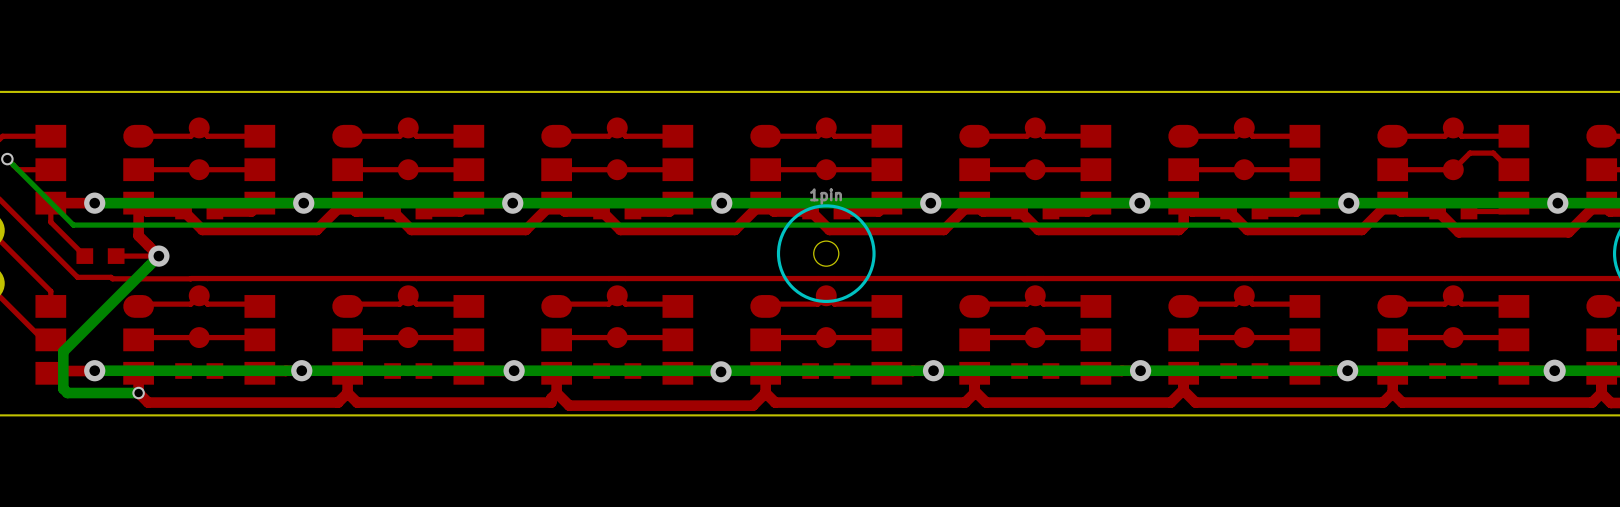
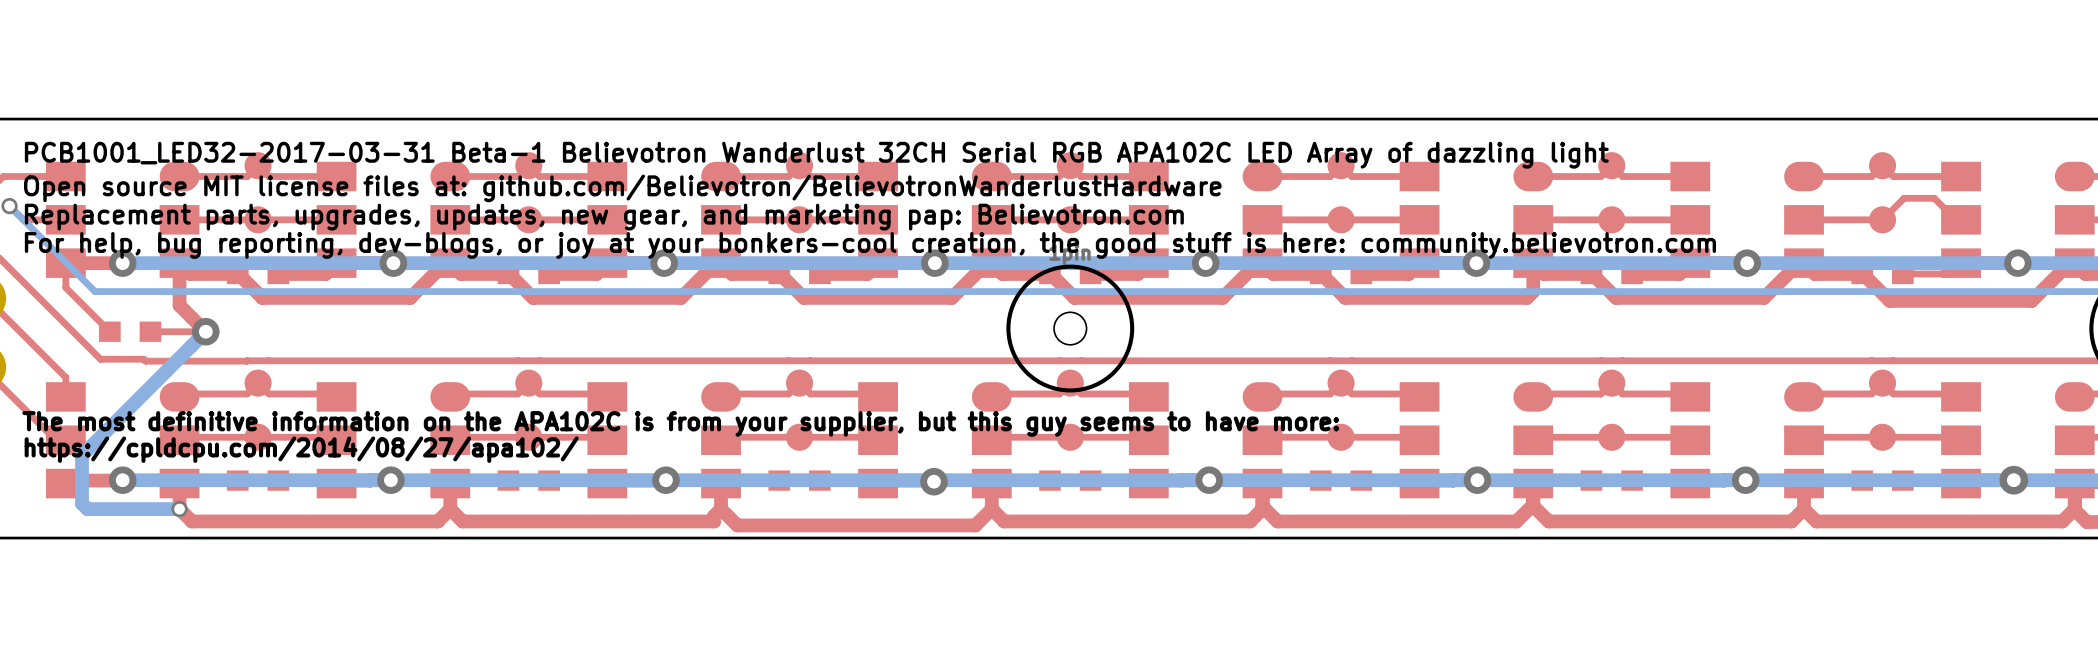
text: none -> PCB1001_LED32-2017-03-31 Beta-1 Believotron Wanderlust 32CH Serial RGB APA102C LED Array of dazzling light (816, 155)
text: none -> Open source MIT license files at: github.com/Believotron/BelievotronWanderlustHardware (622, 188)
text: none -> Replacement parts, upgrades, updates, new gear, and marketing pap: Believotron.com (604, 217)
text: none -> For help, bug reporting, dev-blogs, or joy at your bonkers-cool creation, the good stuff is here: community.believotron.com (870, 245)
text: none -> The most definitive information on the APA102C is from your supplier, but this guy seems to have more: (680, 423)
text: none -> https://cpldcpu.com/2014/08/27/apa102/ (301, 449)

